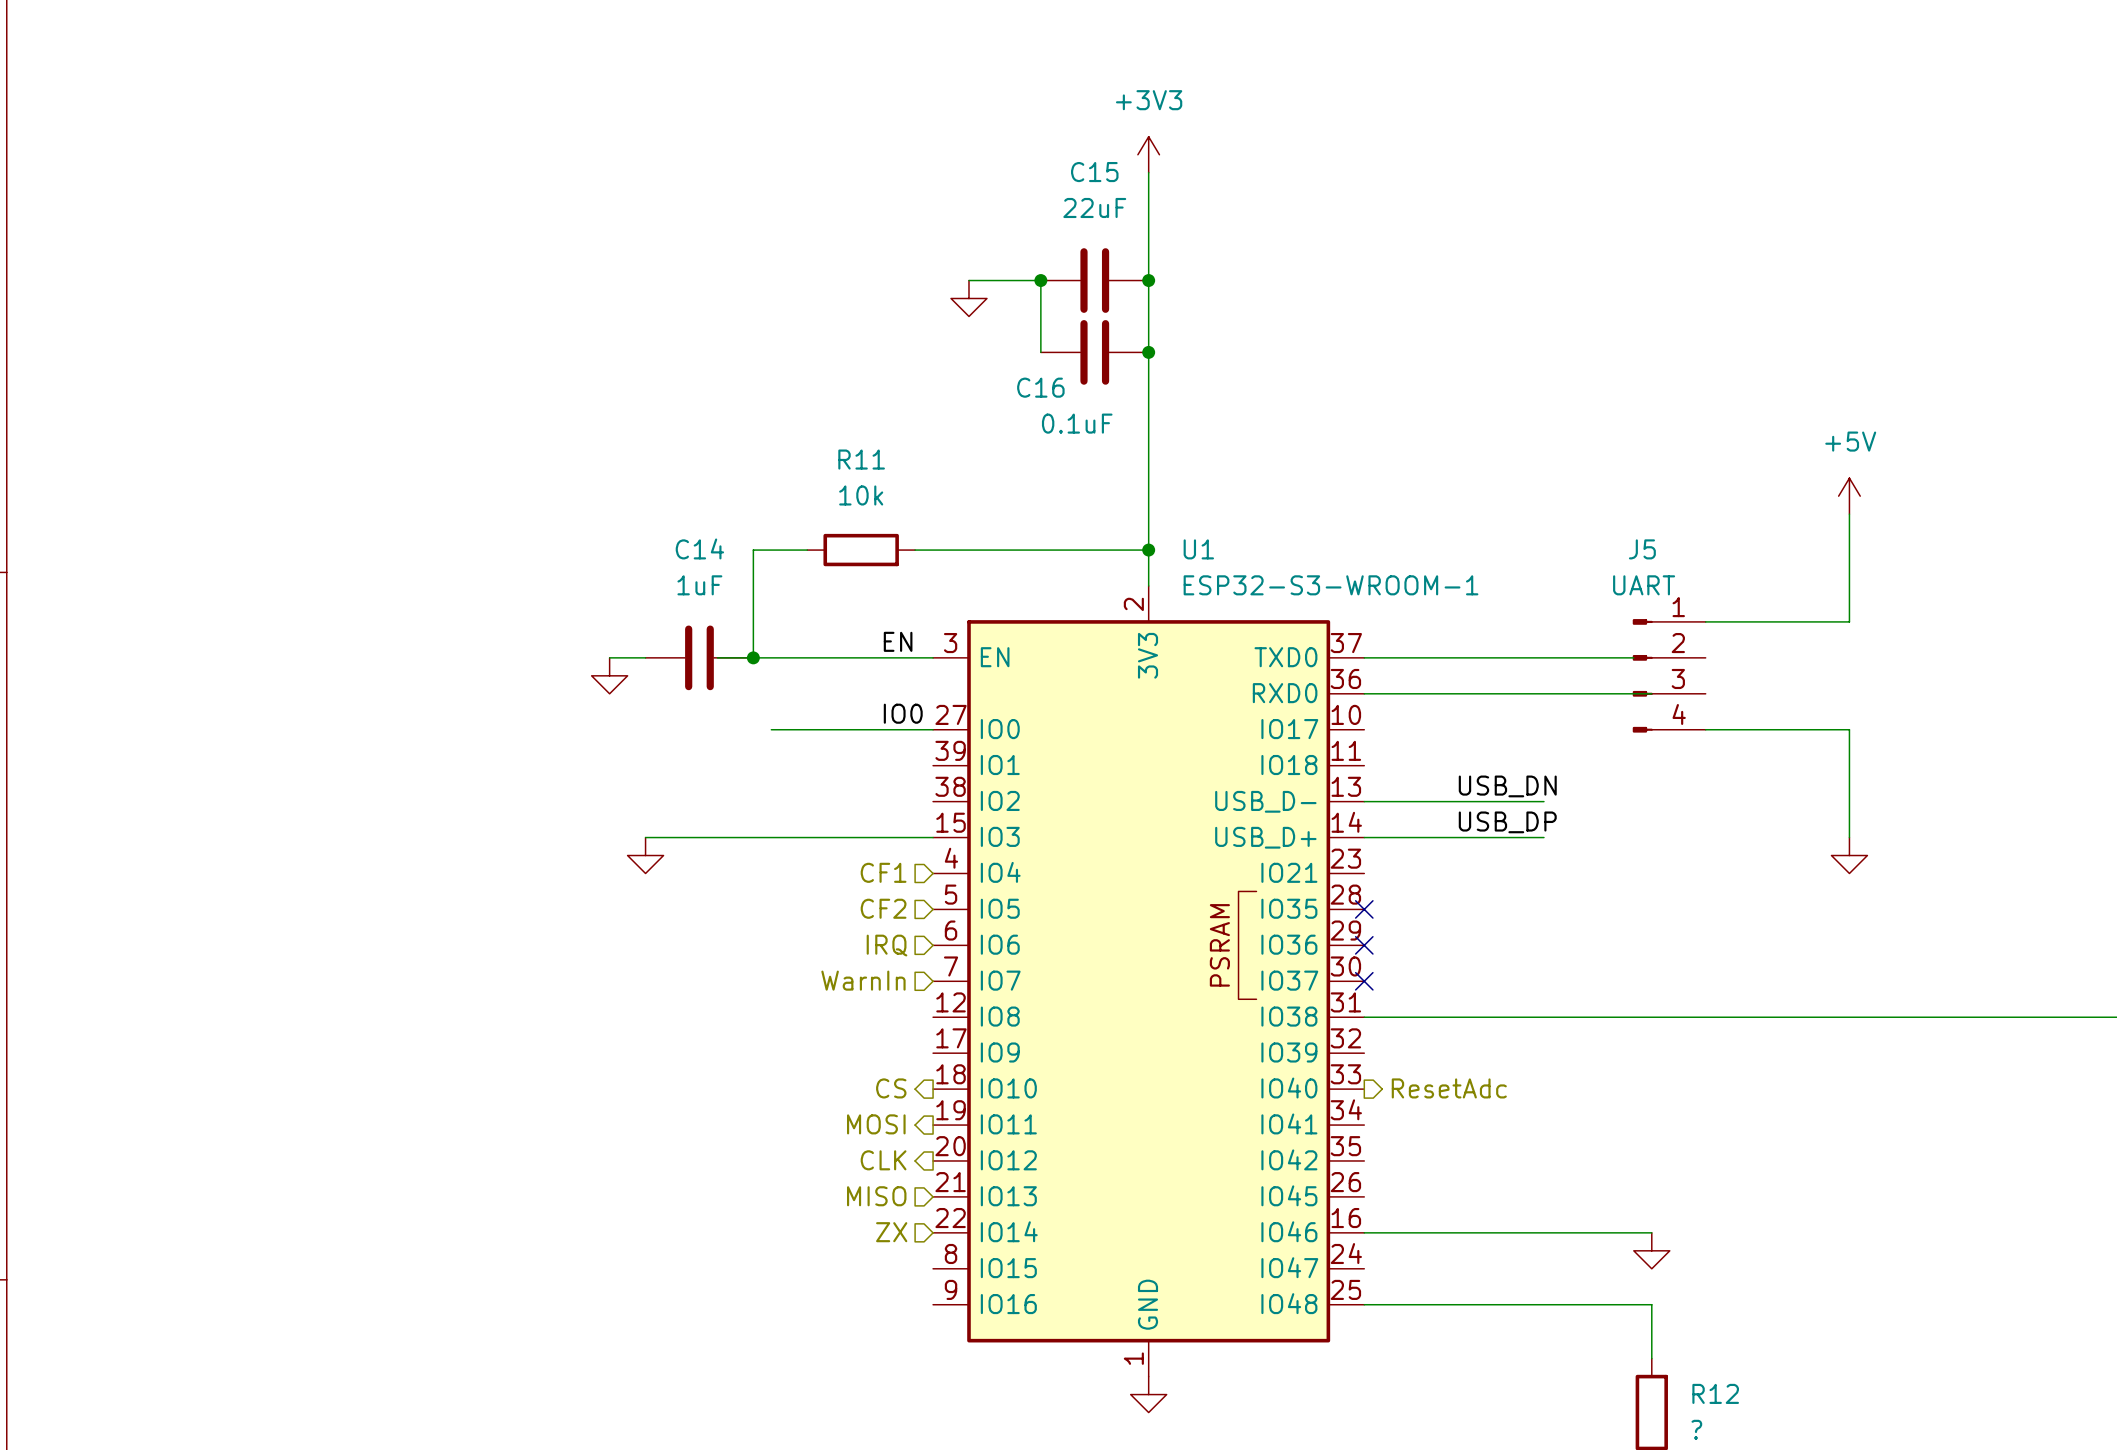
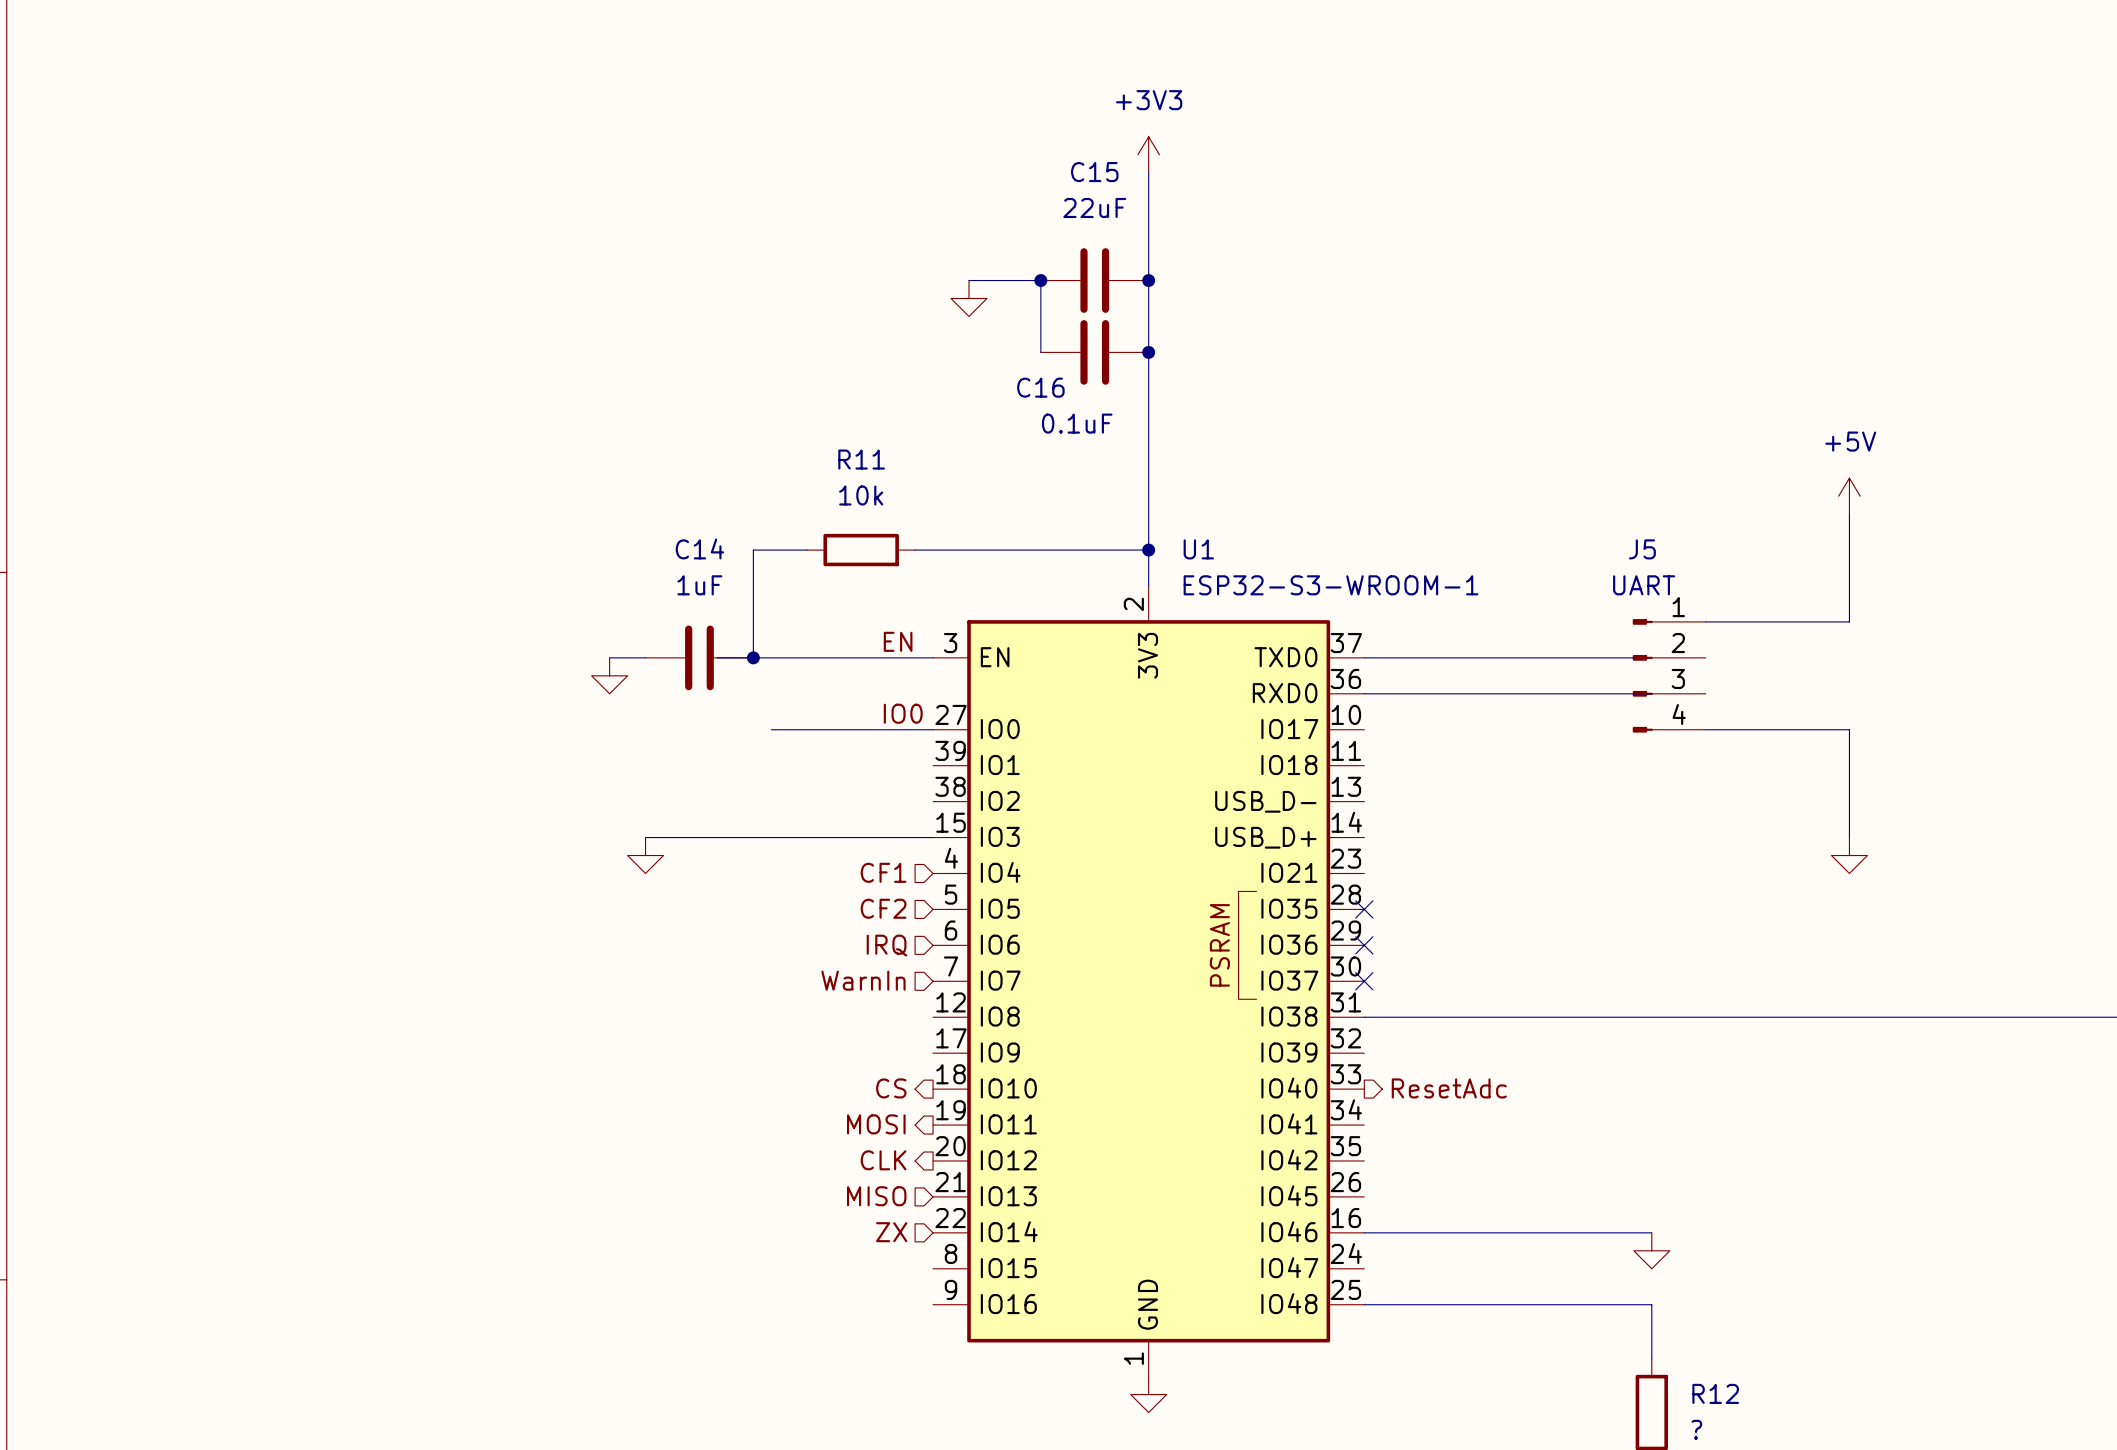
label: USB_DN (1507, 786) -> none
wire: (1364, 801) (1543, 801) -> none
label: USB_DP (1507, 822) -> none
wire: (1364, 837) (1543, 837) -> none

